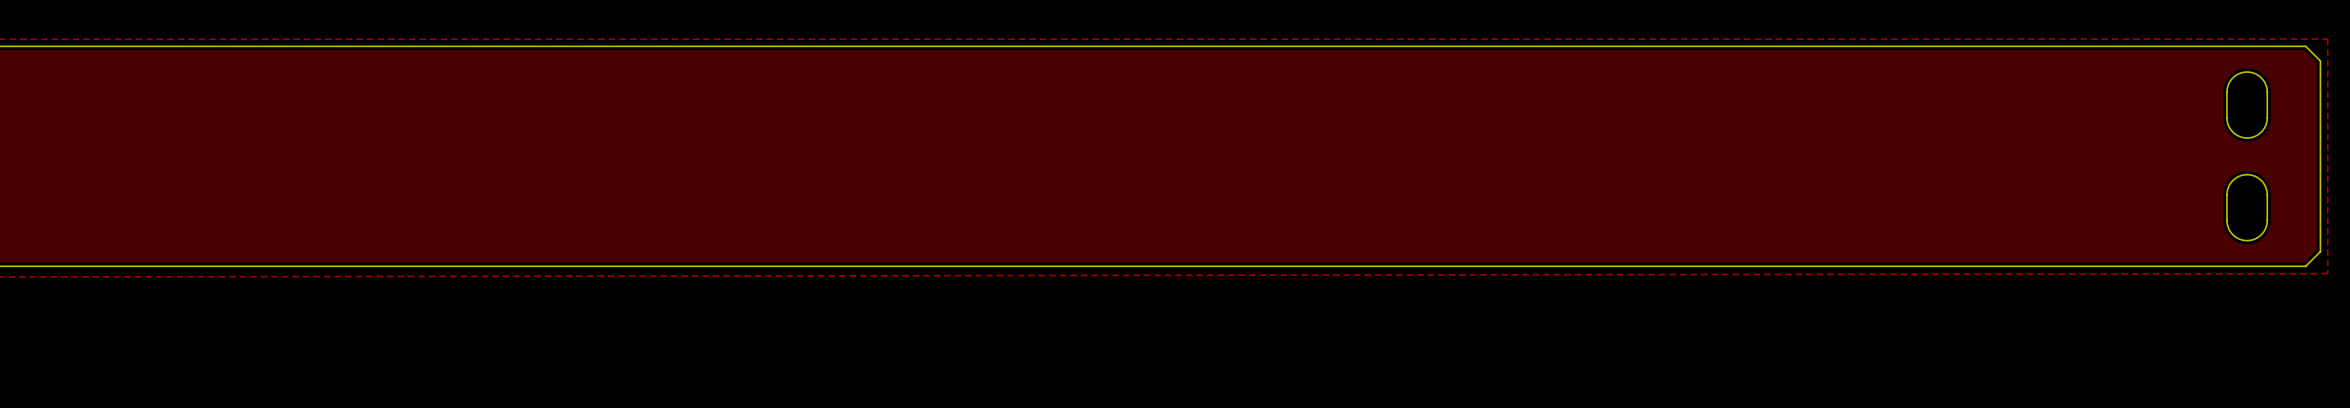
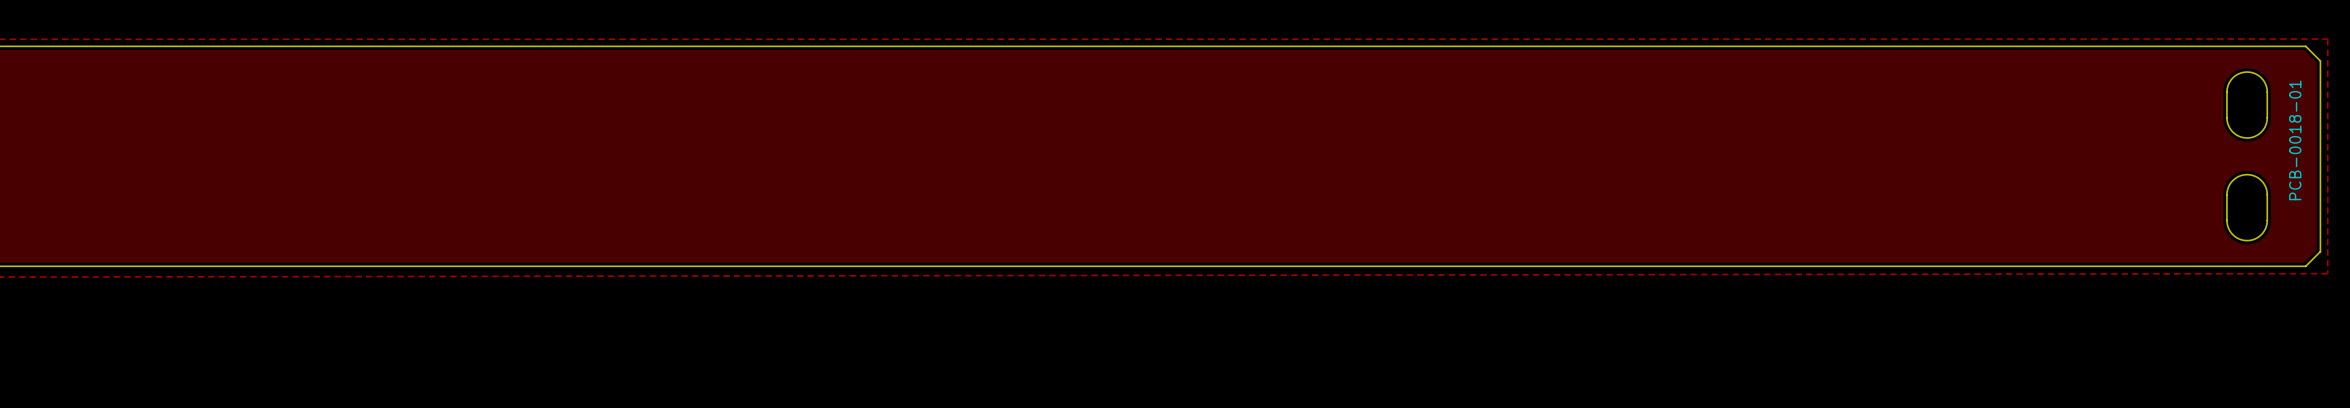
text: none -> PCB-0018-01 (2295, 140)

